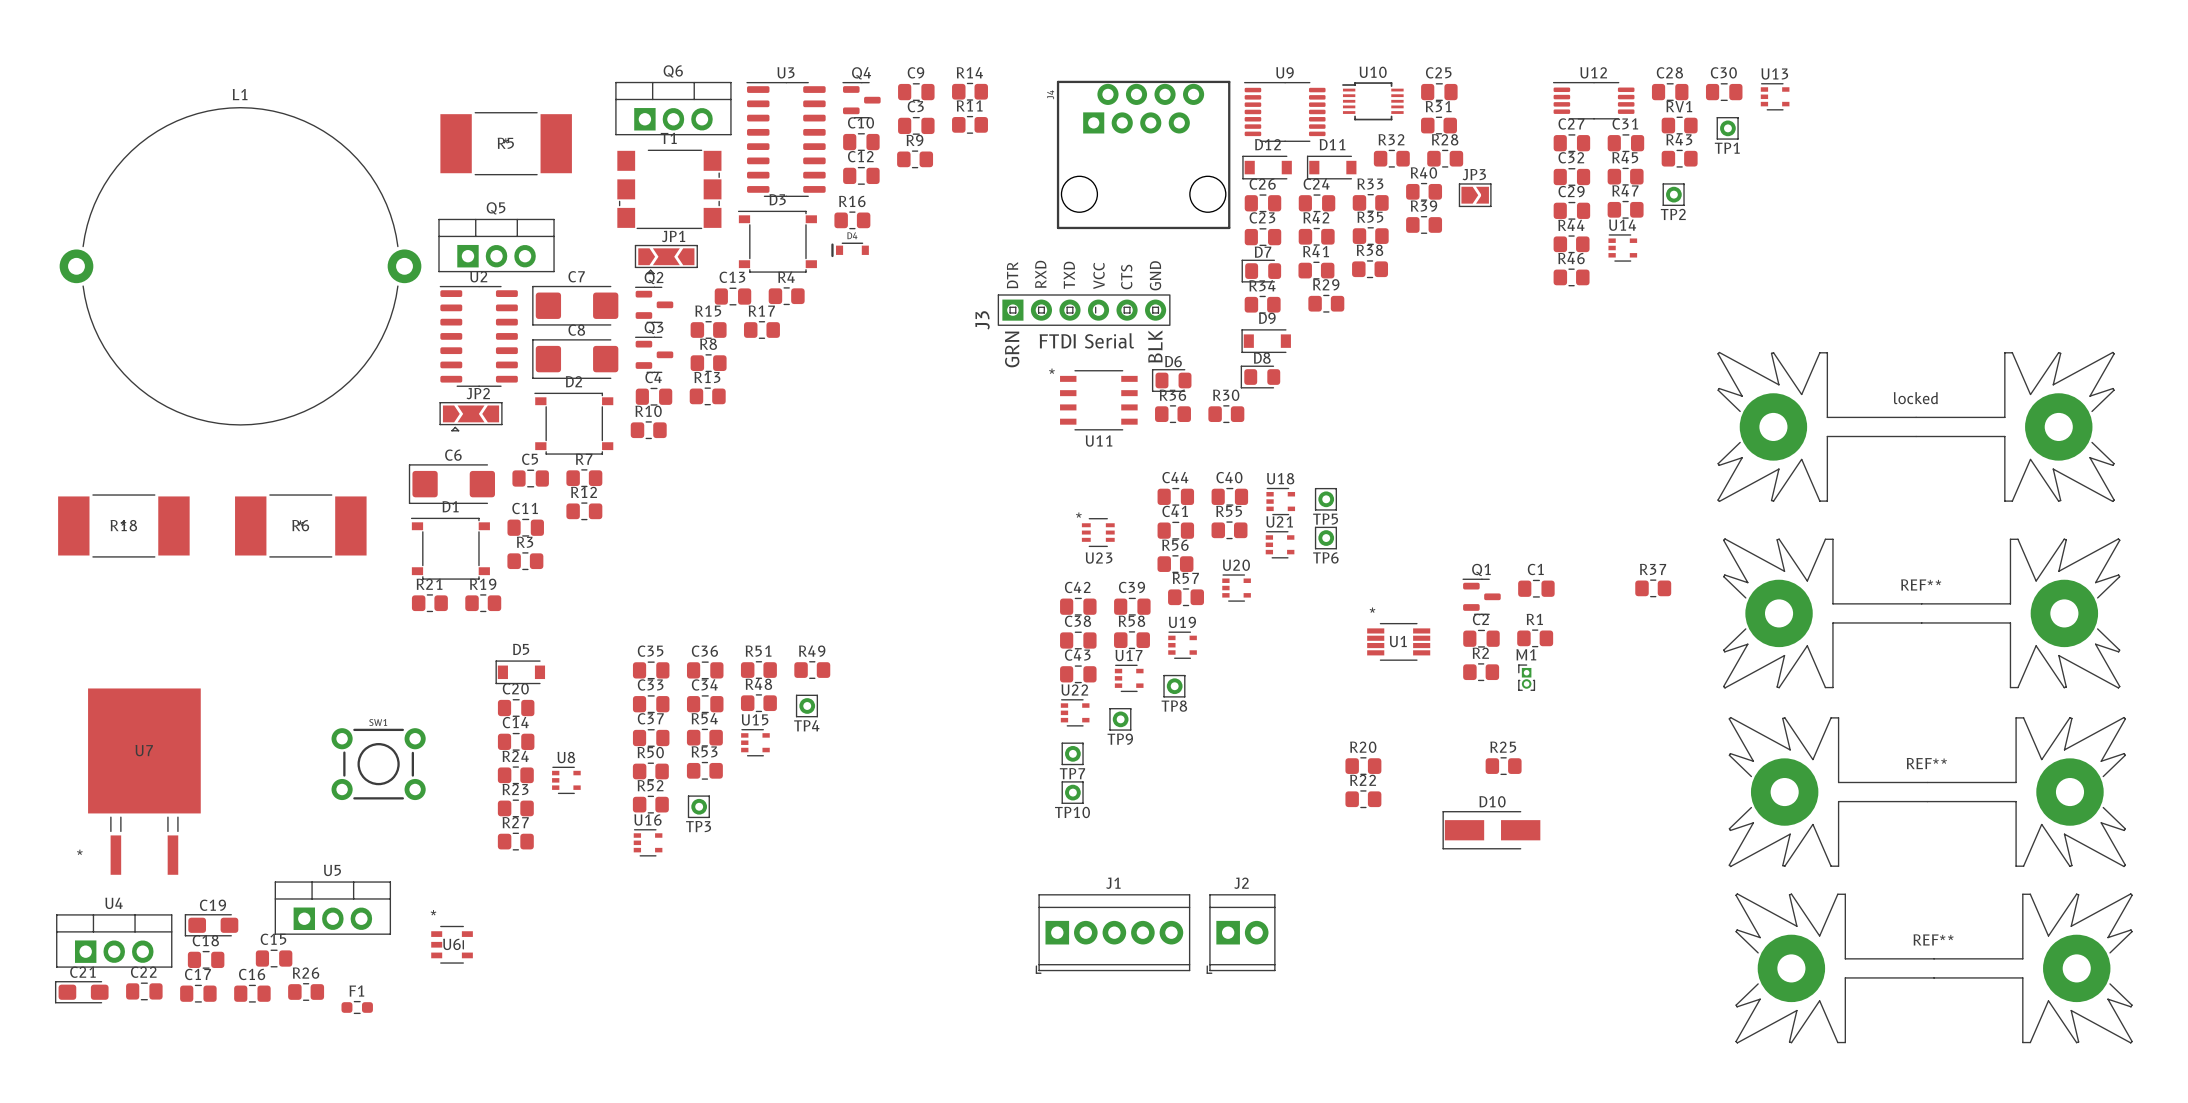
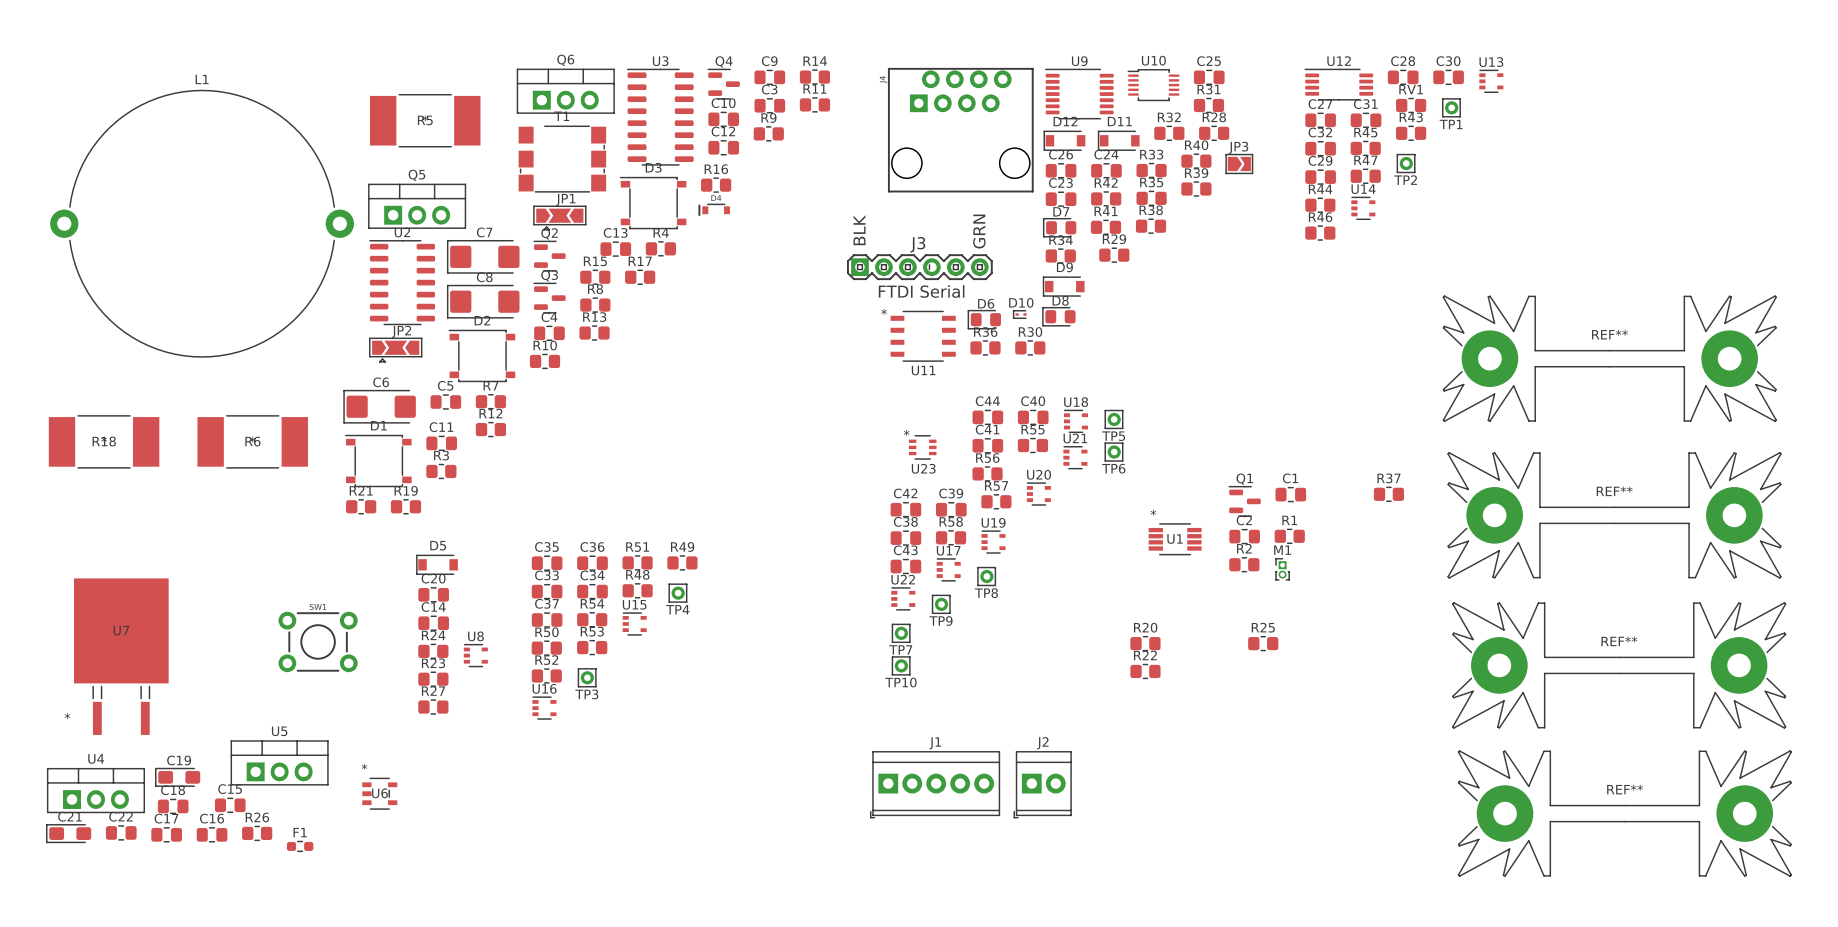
J3 footprint: [997, 294, 1171, 326] -> [847, 254, 993, 281]
J3 name position: J3 (982, 320) -> J3 (917, 244)
locked name: locked (1915, 398) -> REF** (1609, 334)
D10 footprint: [1442, 811, 1541, 850] -> [1012, 310, 1027, 319]

